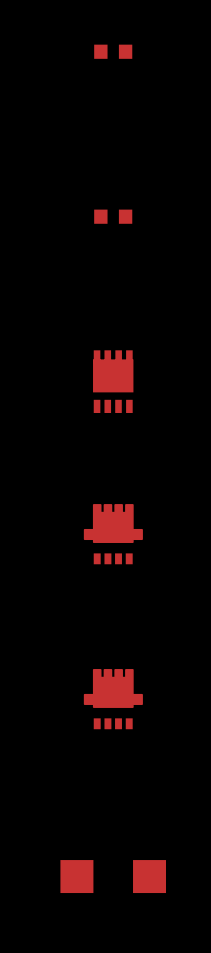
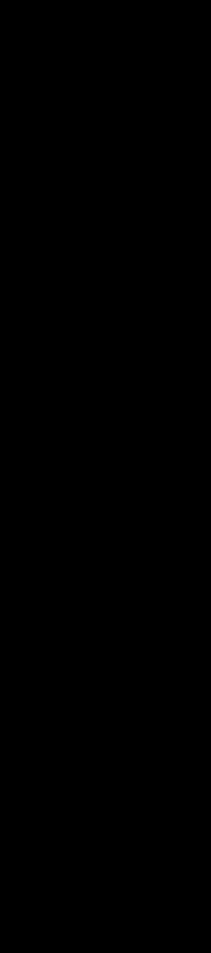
part: (113, 51) -> none
part: (113, 216) -> none
part: (113, 381) -> none
part: (113, 534) -> none
part: (113, 699) -> none
part: (113, 876) -> none

